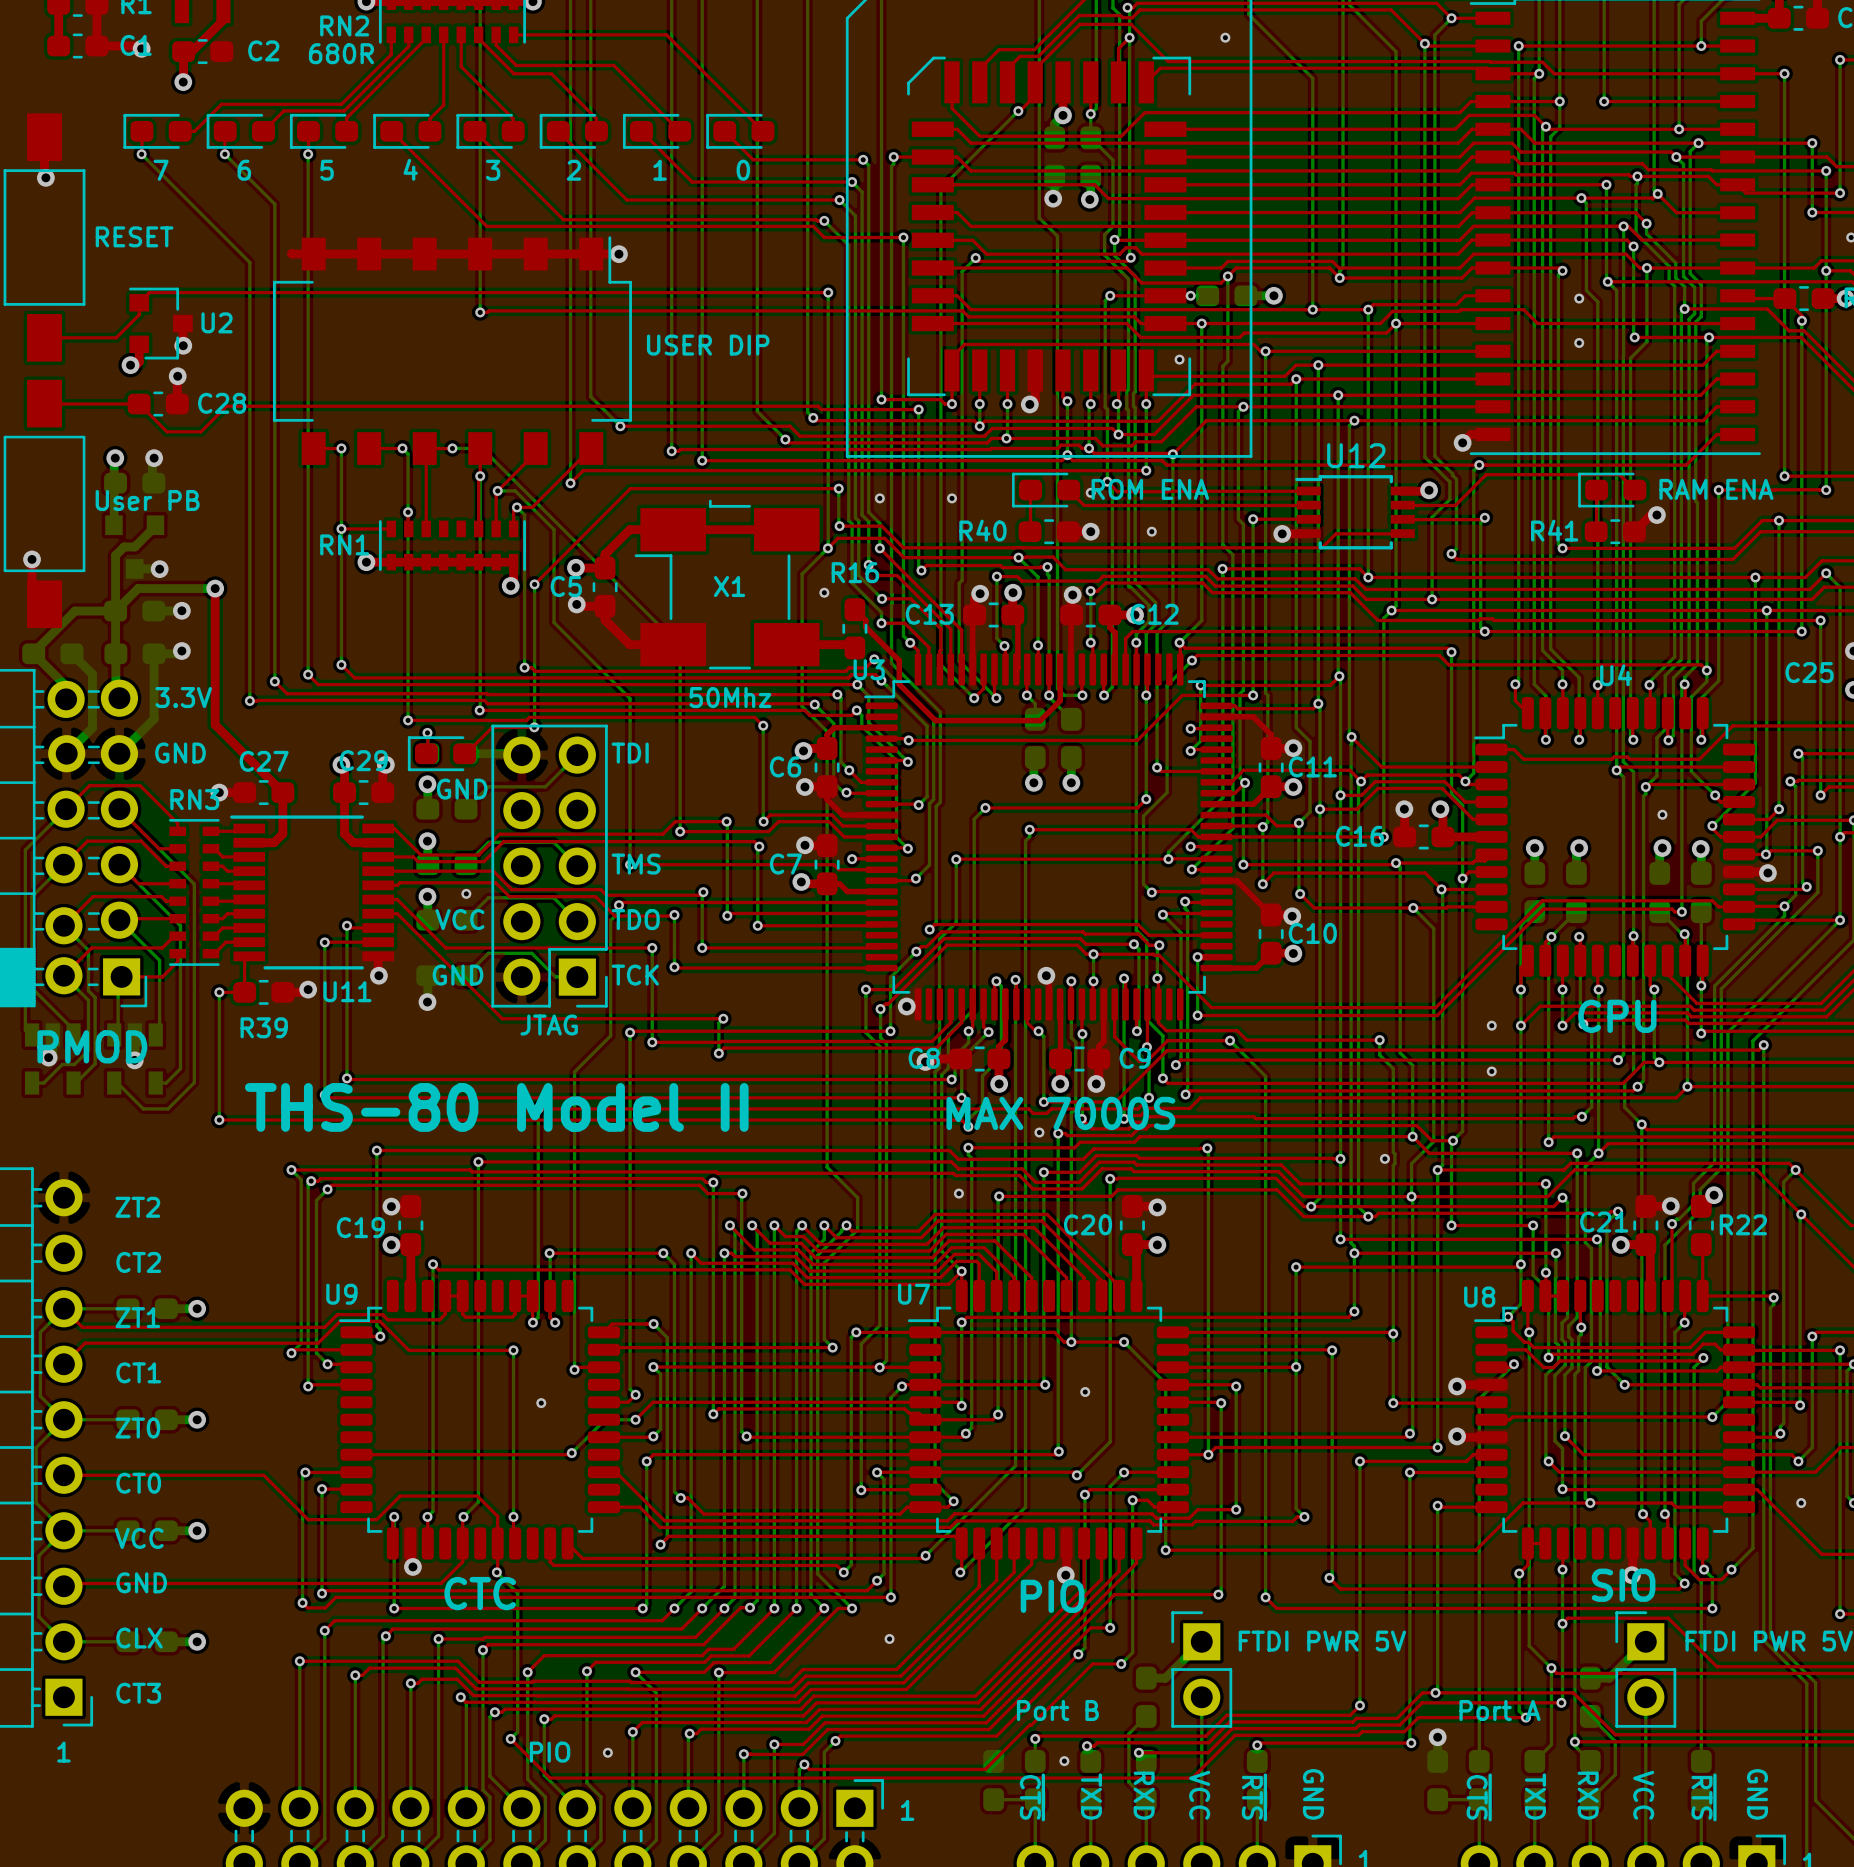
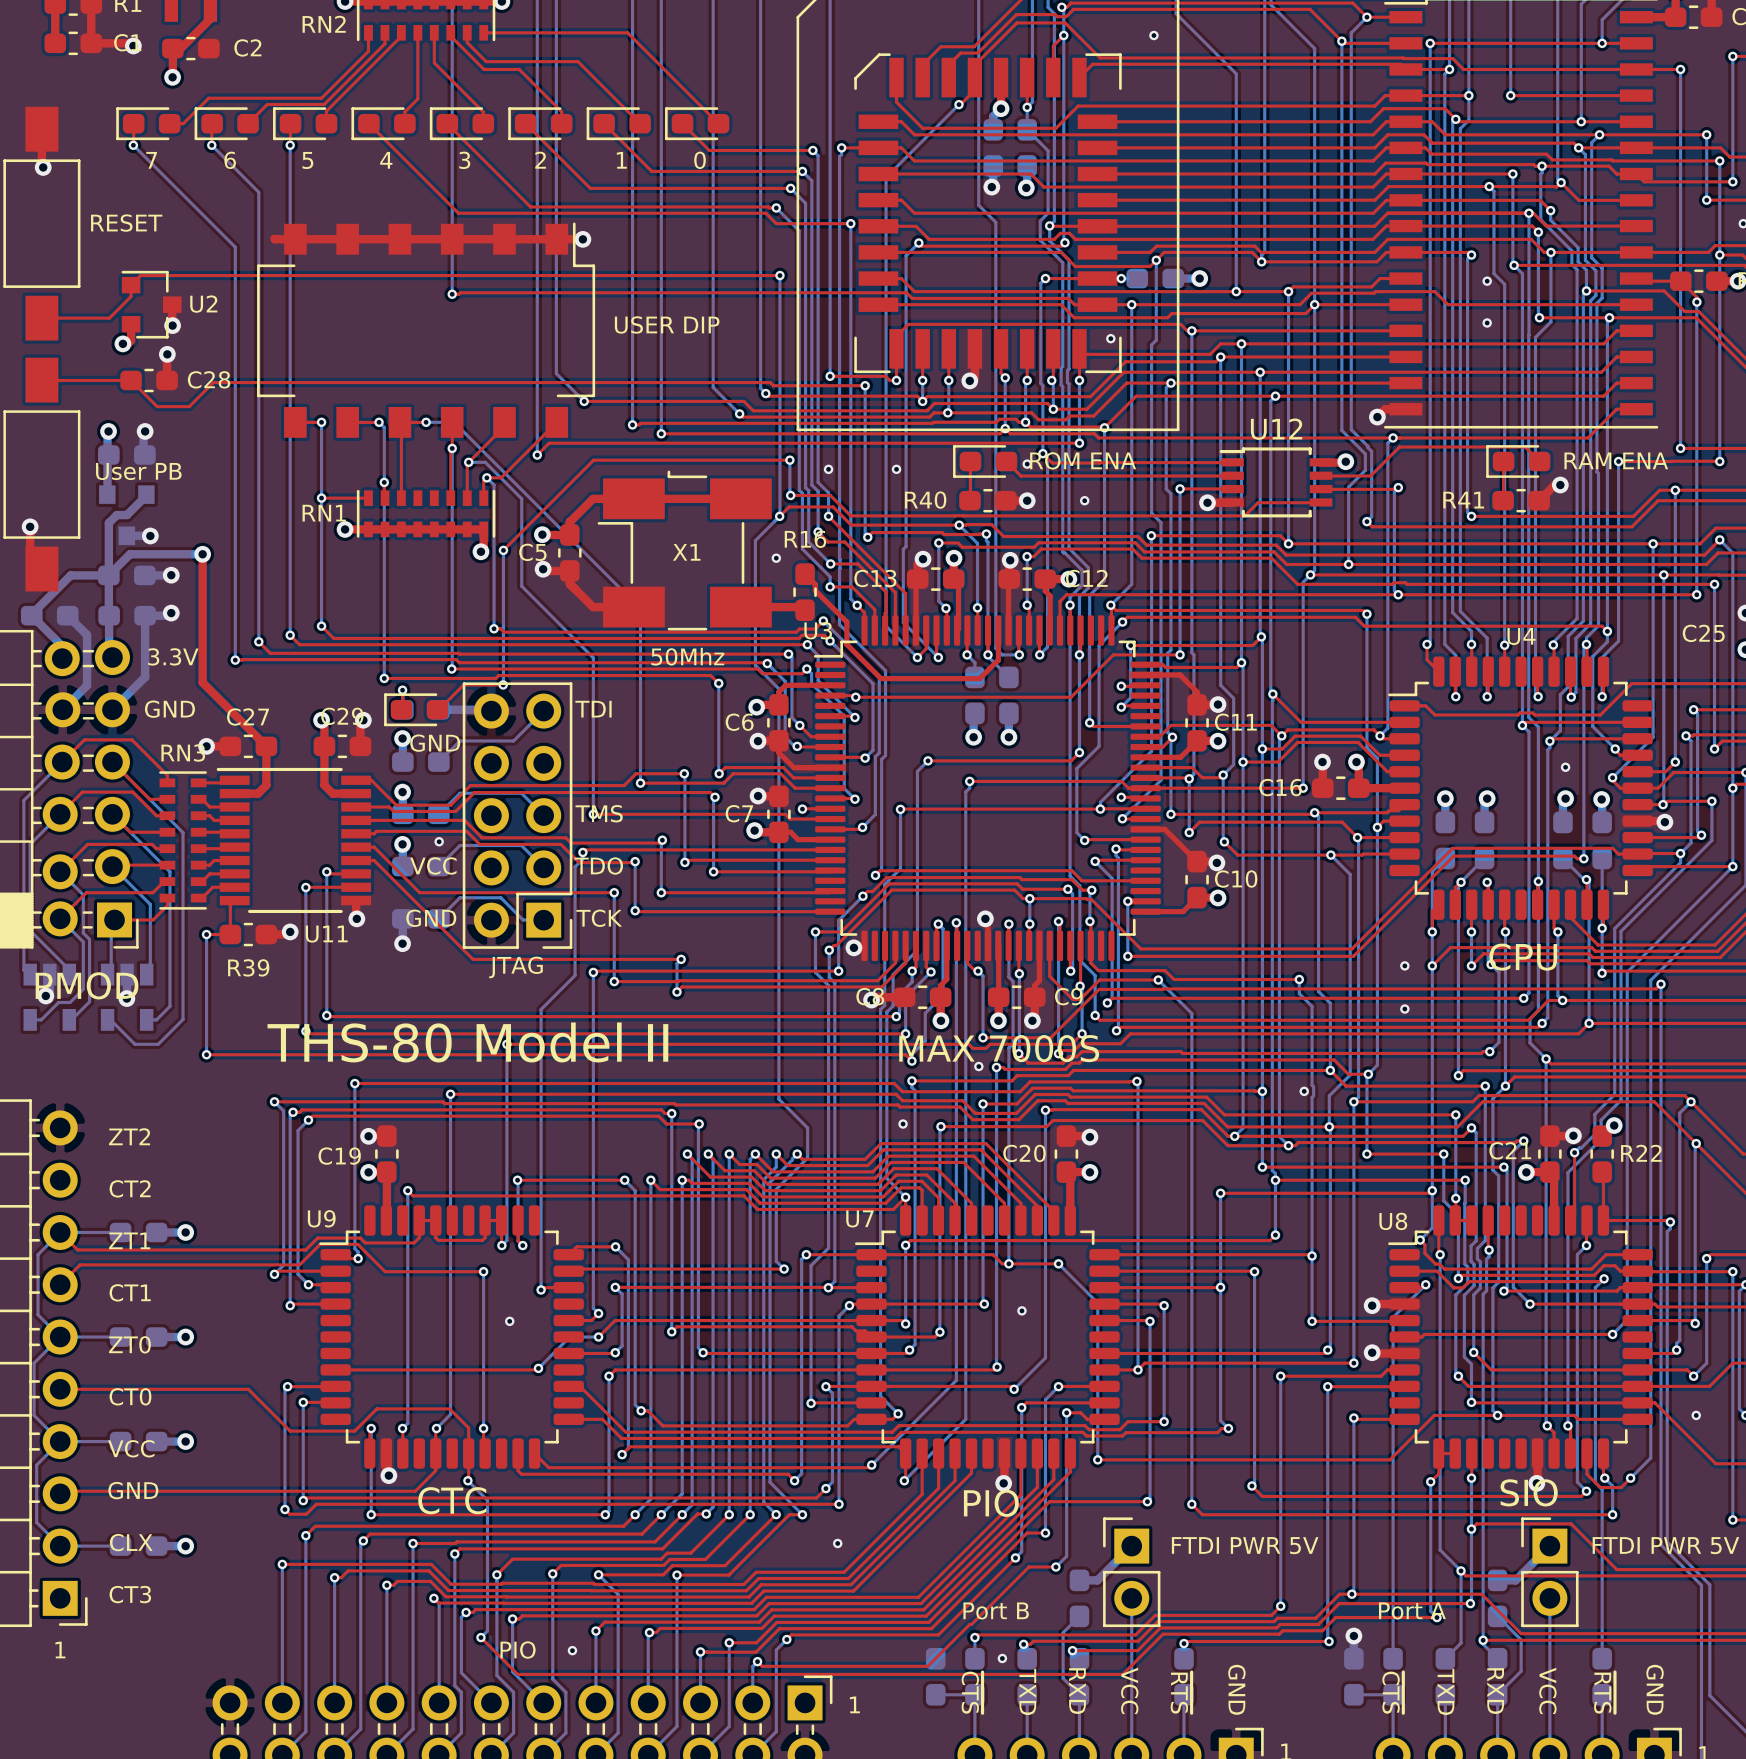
RN2 value: 680R (341, 53) -> none

